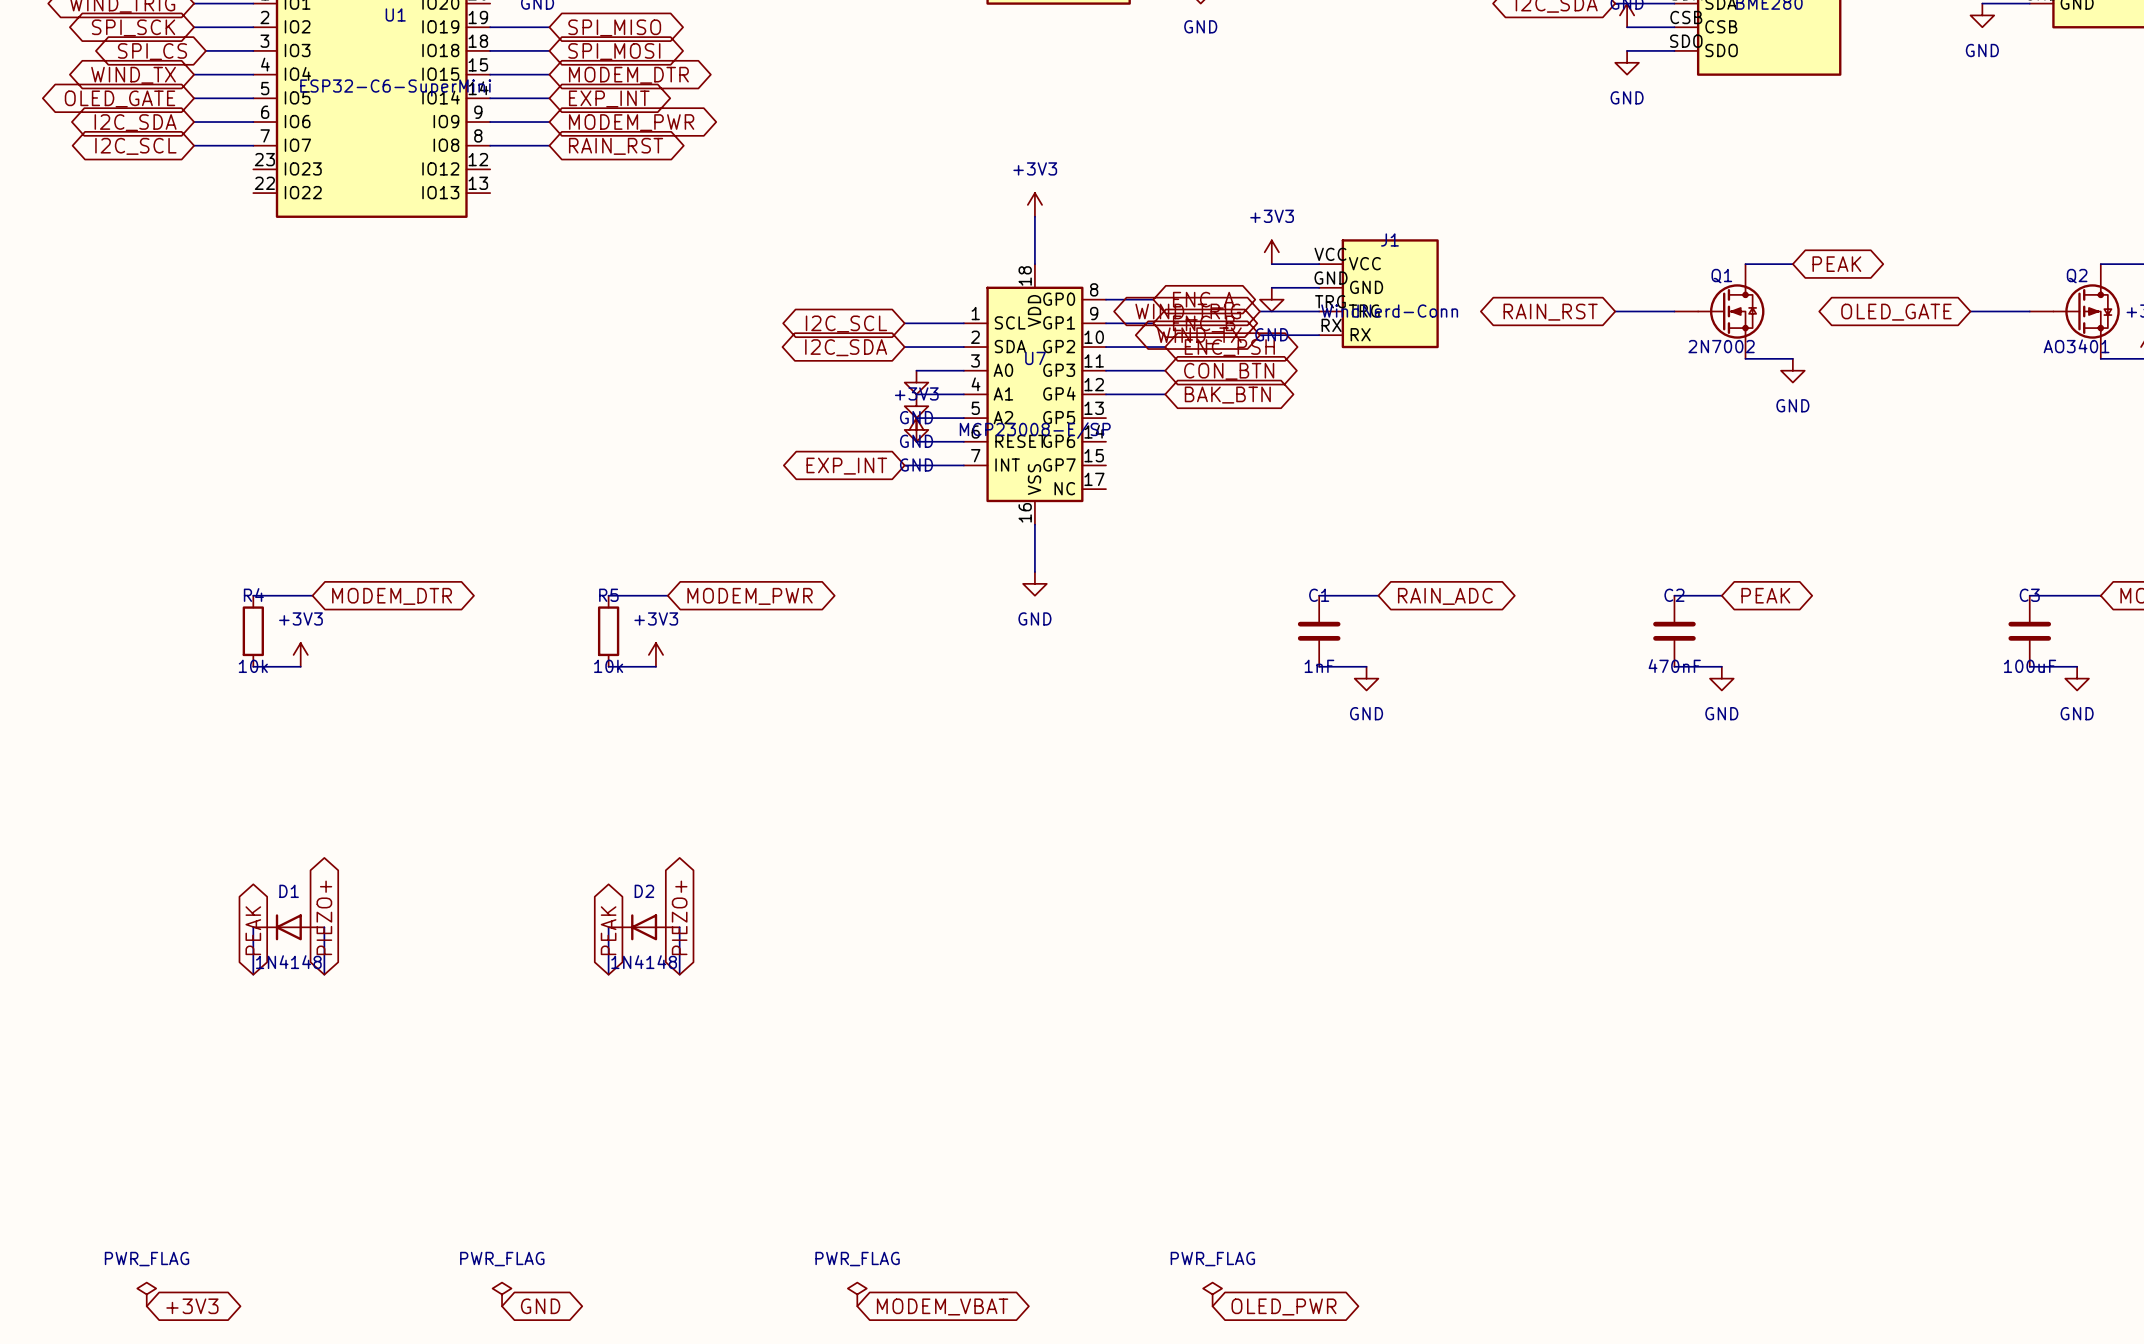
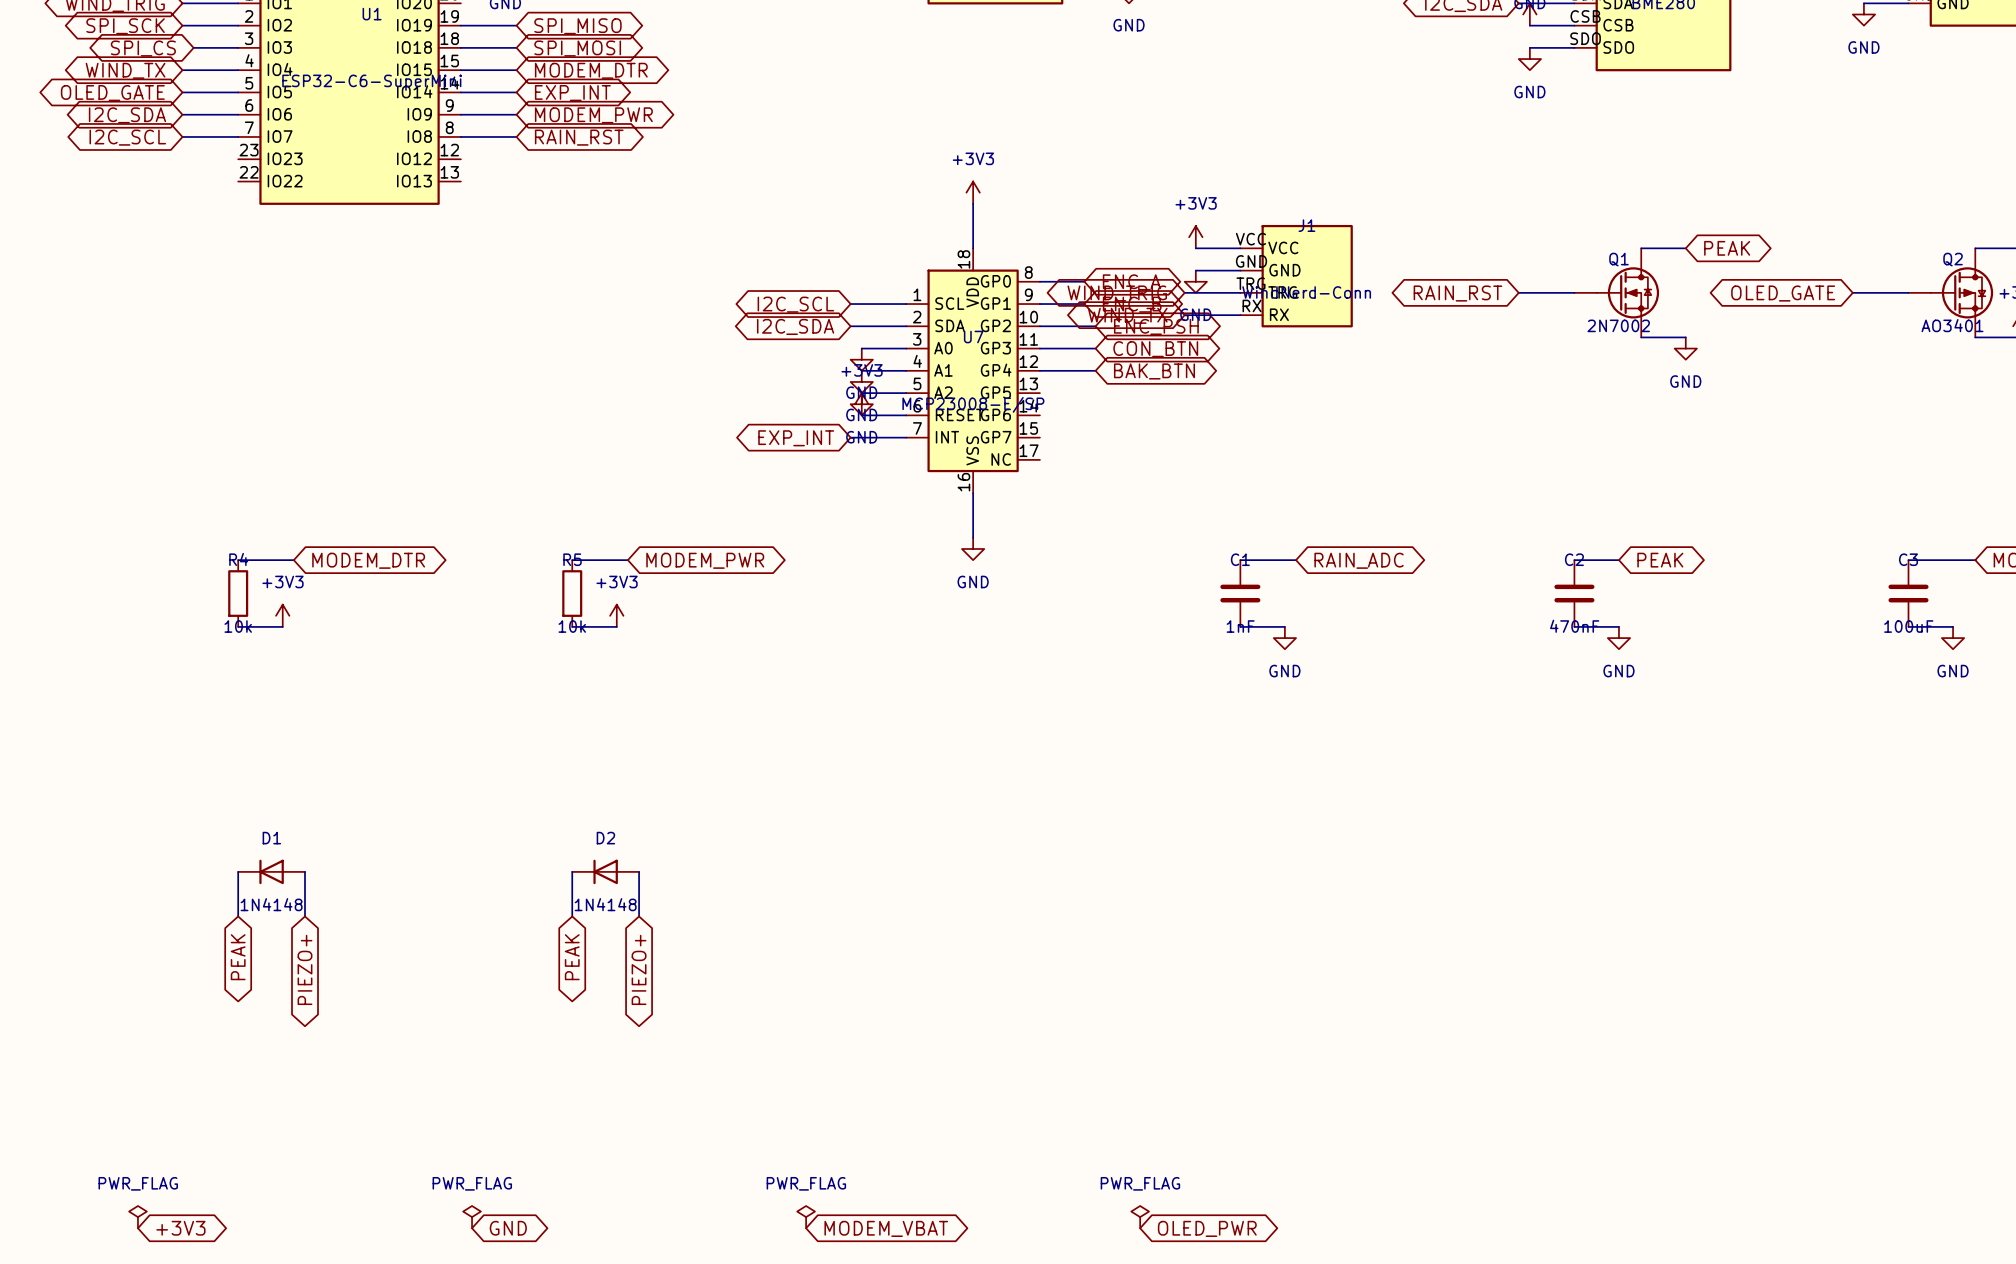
global label rotation: 0° (324, 917) -> 180° (305, 969)
global label rotation: 0° (679, 917) -> 180° (639, 969)
global label rotation: 0° (253, 930) -> 180° (238, 957)
global label rotation: 0° (608, 930) -> 180° (572, 957)

